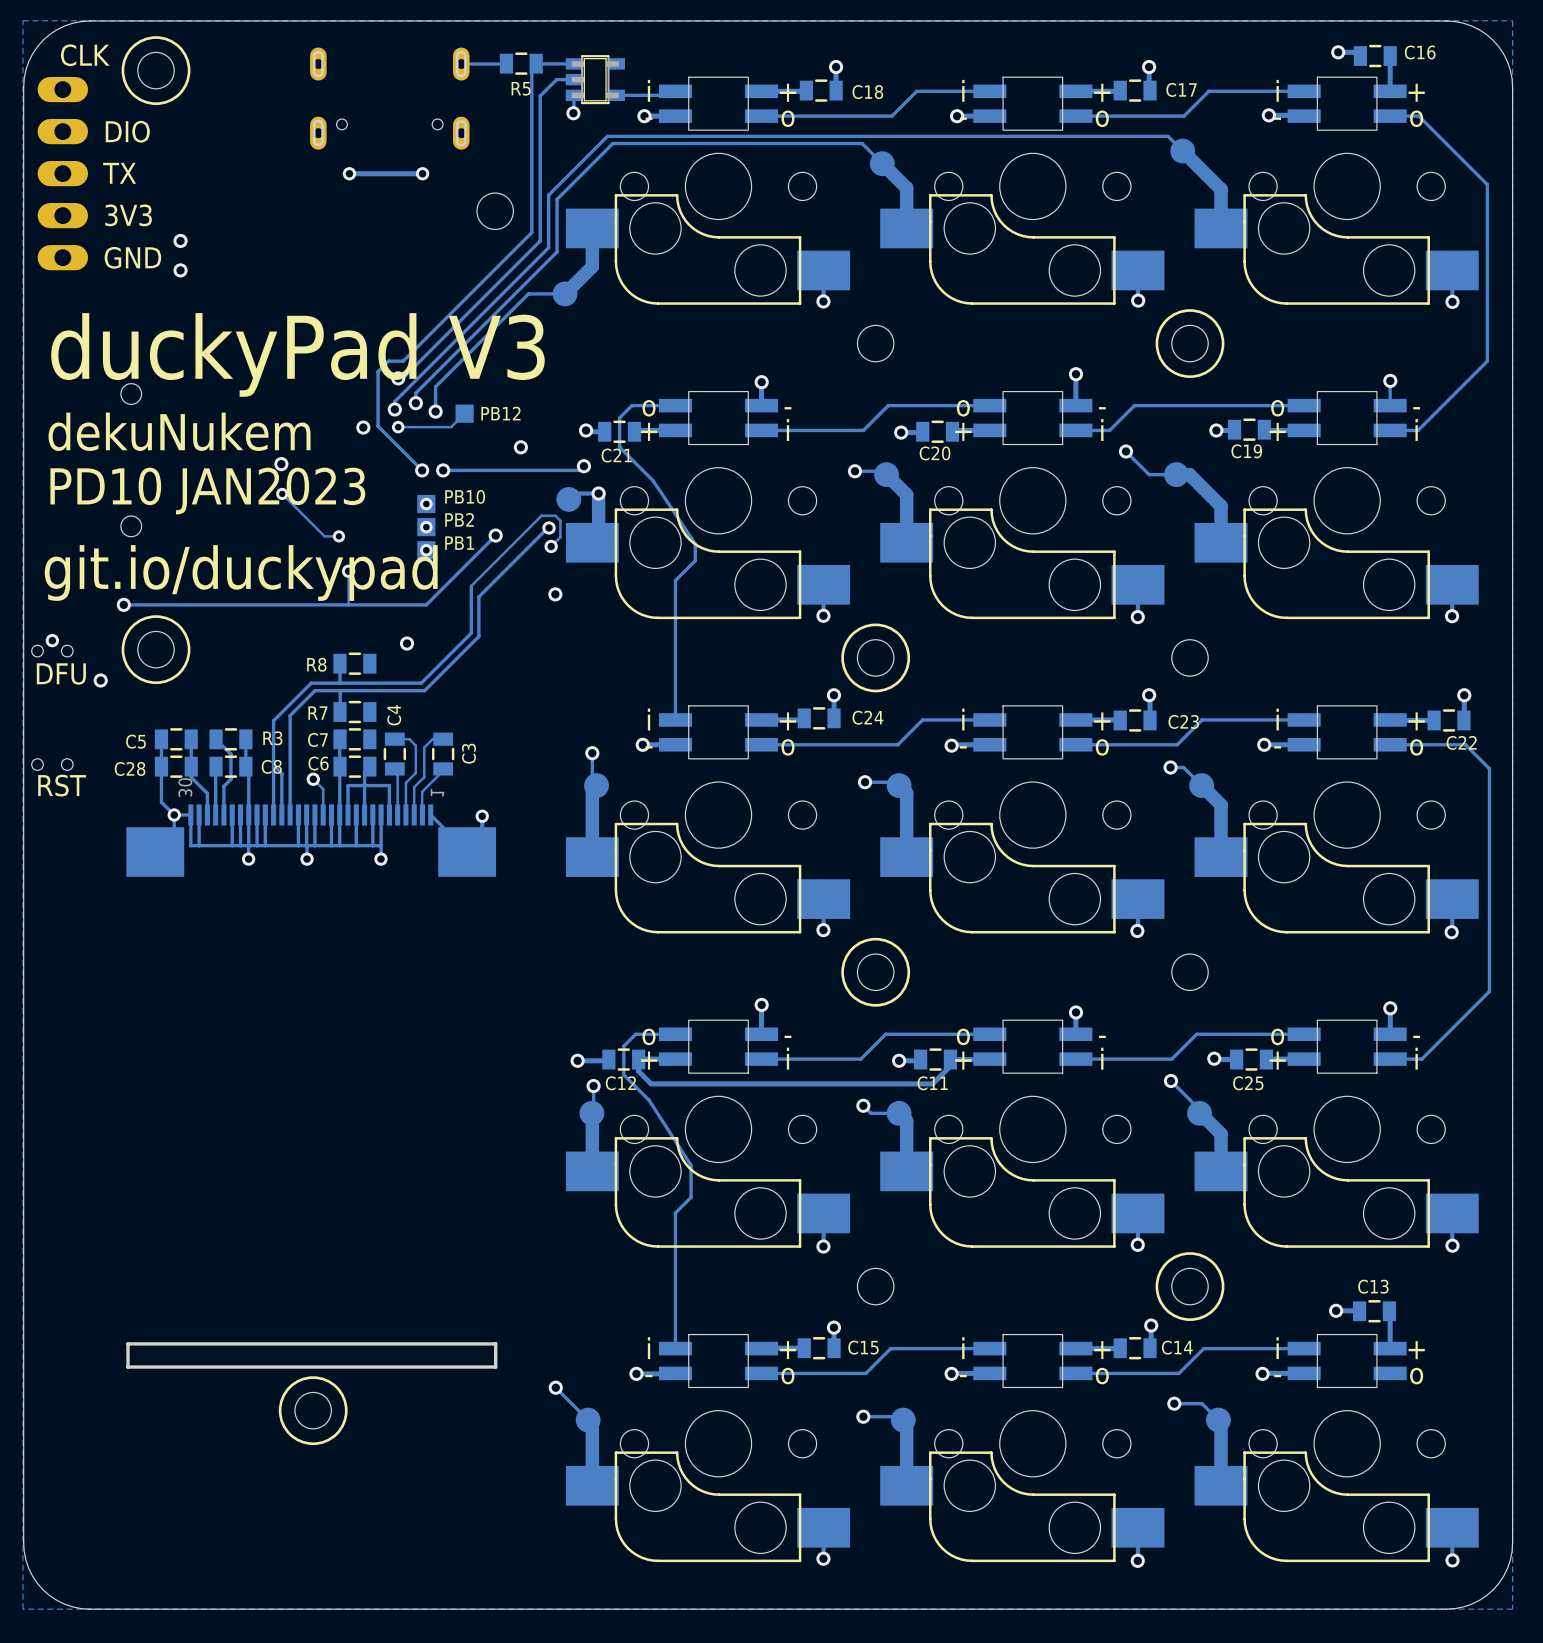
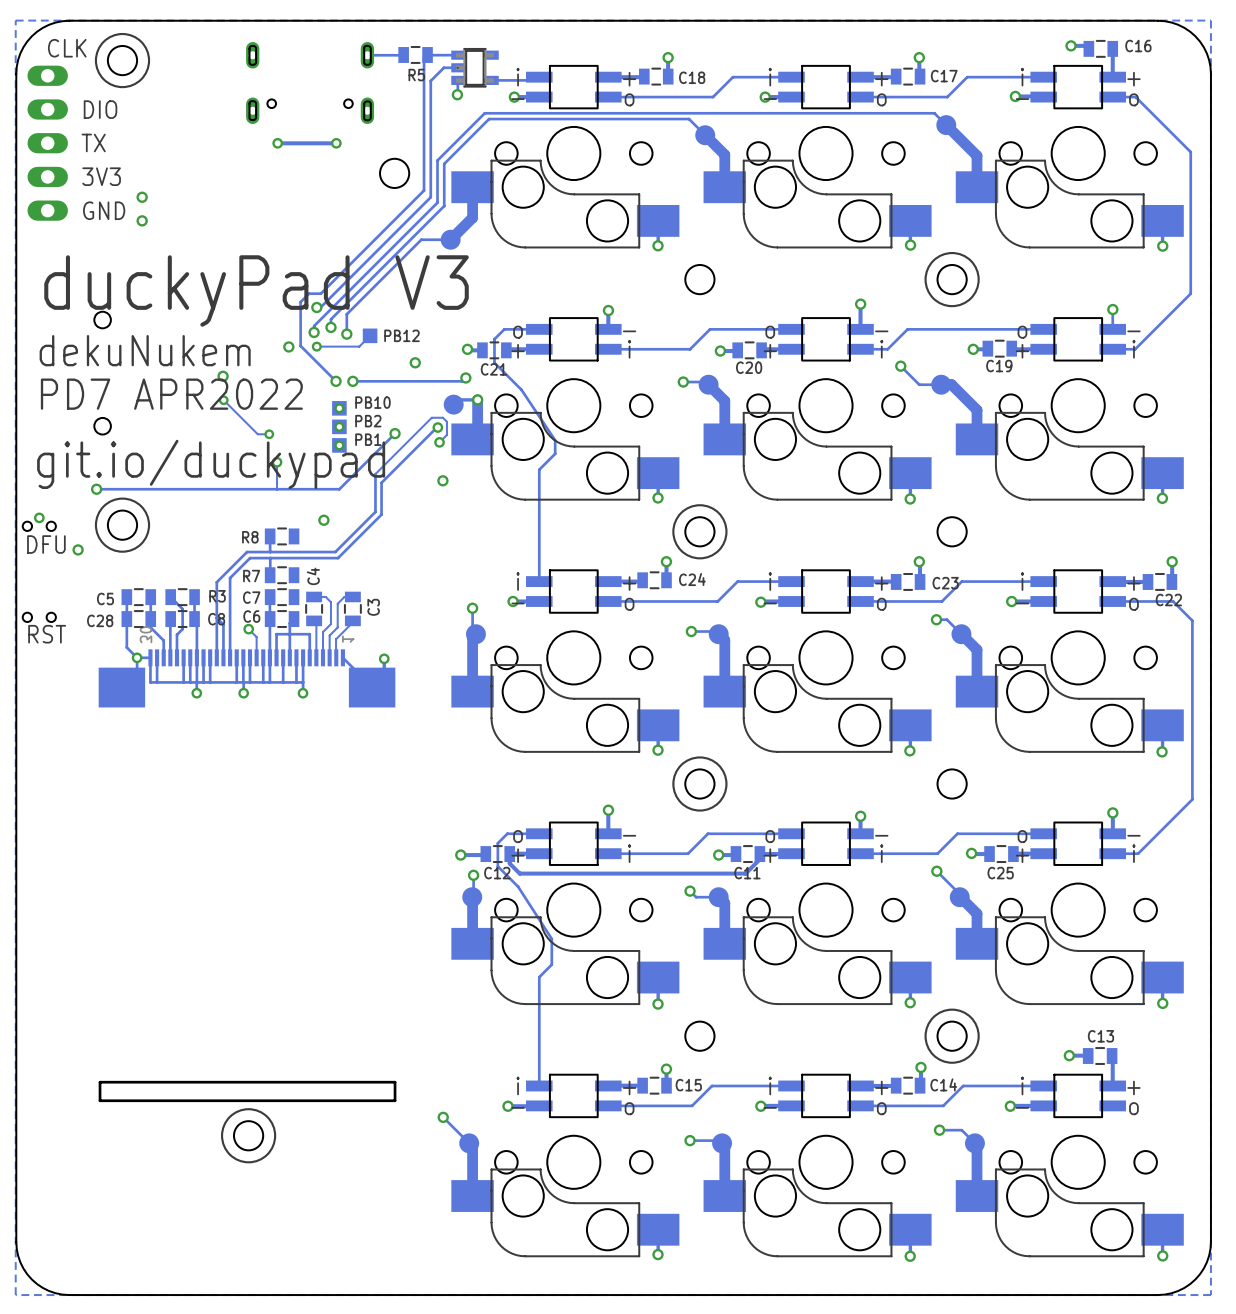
text: PD10 JAN2023 (207, 491) -> PD7 APR2022 (171, 394)

